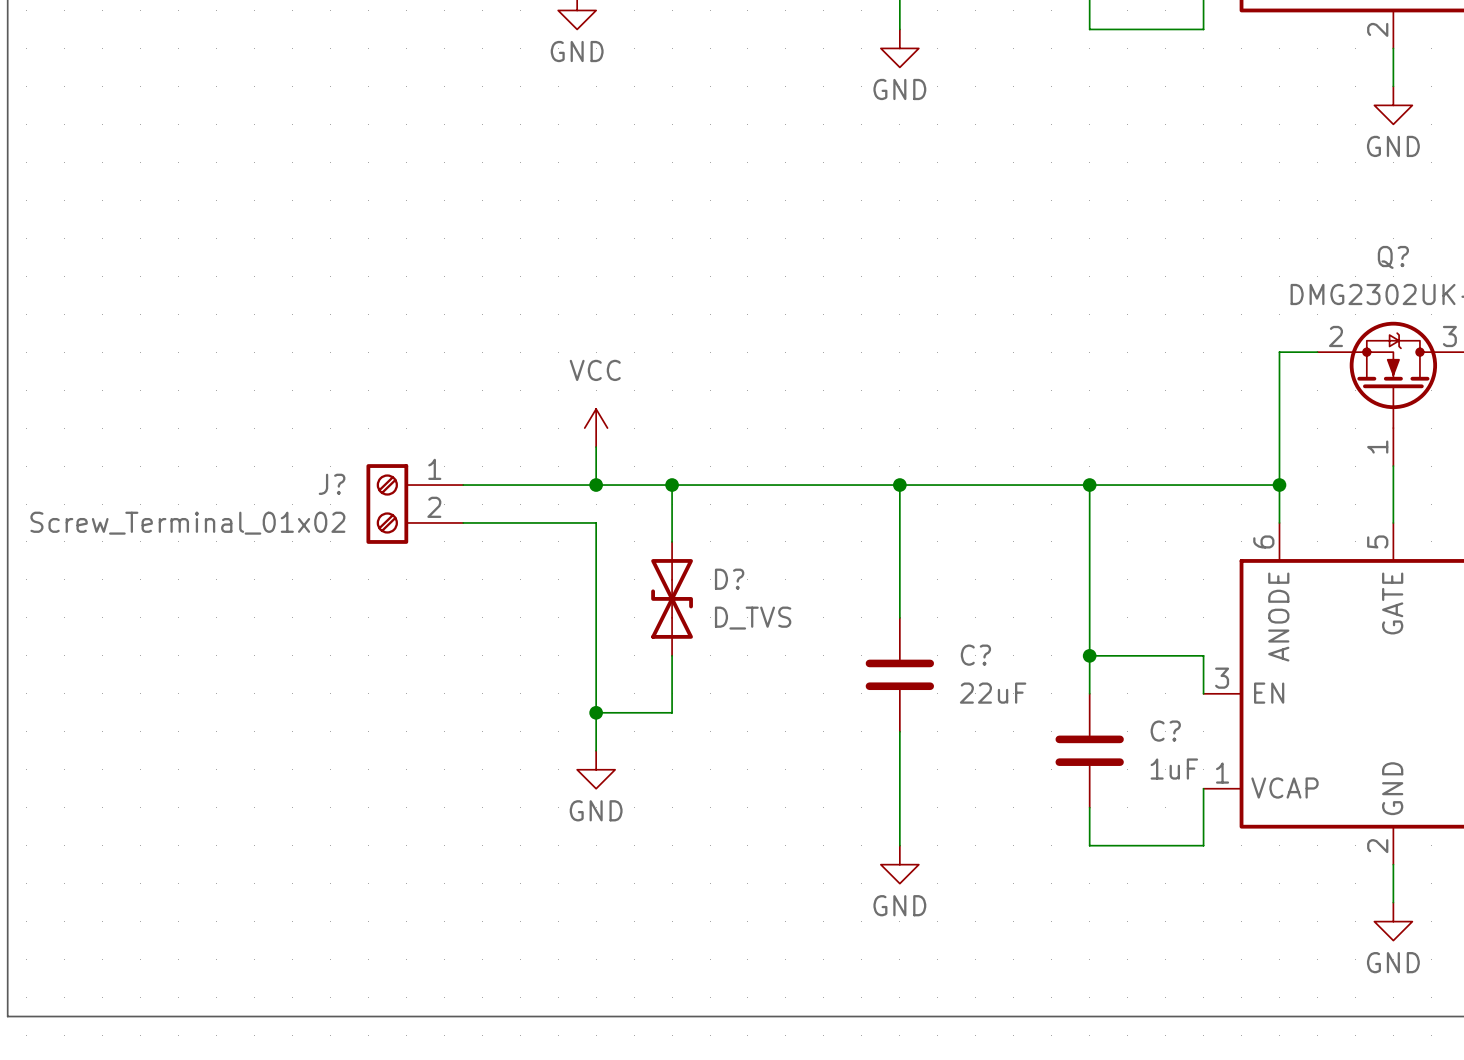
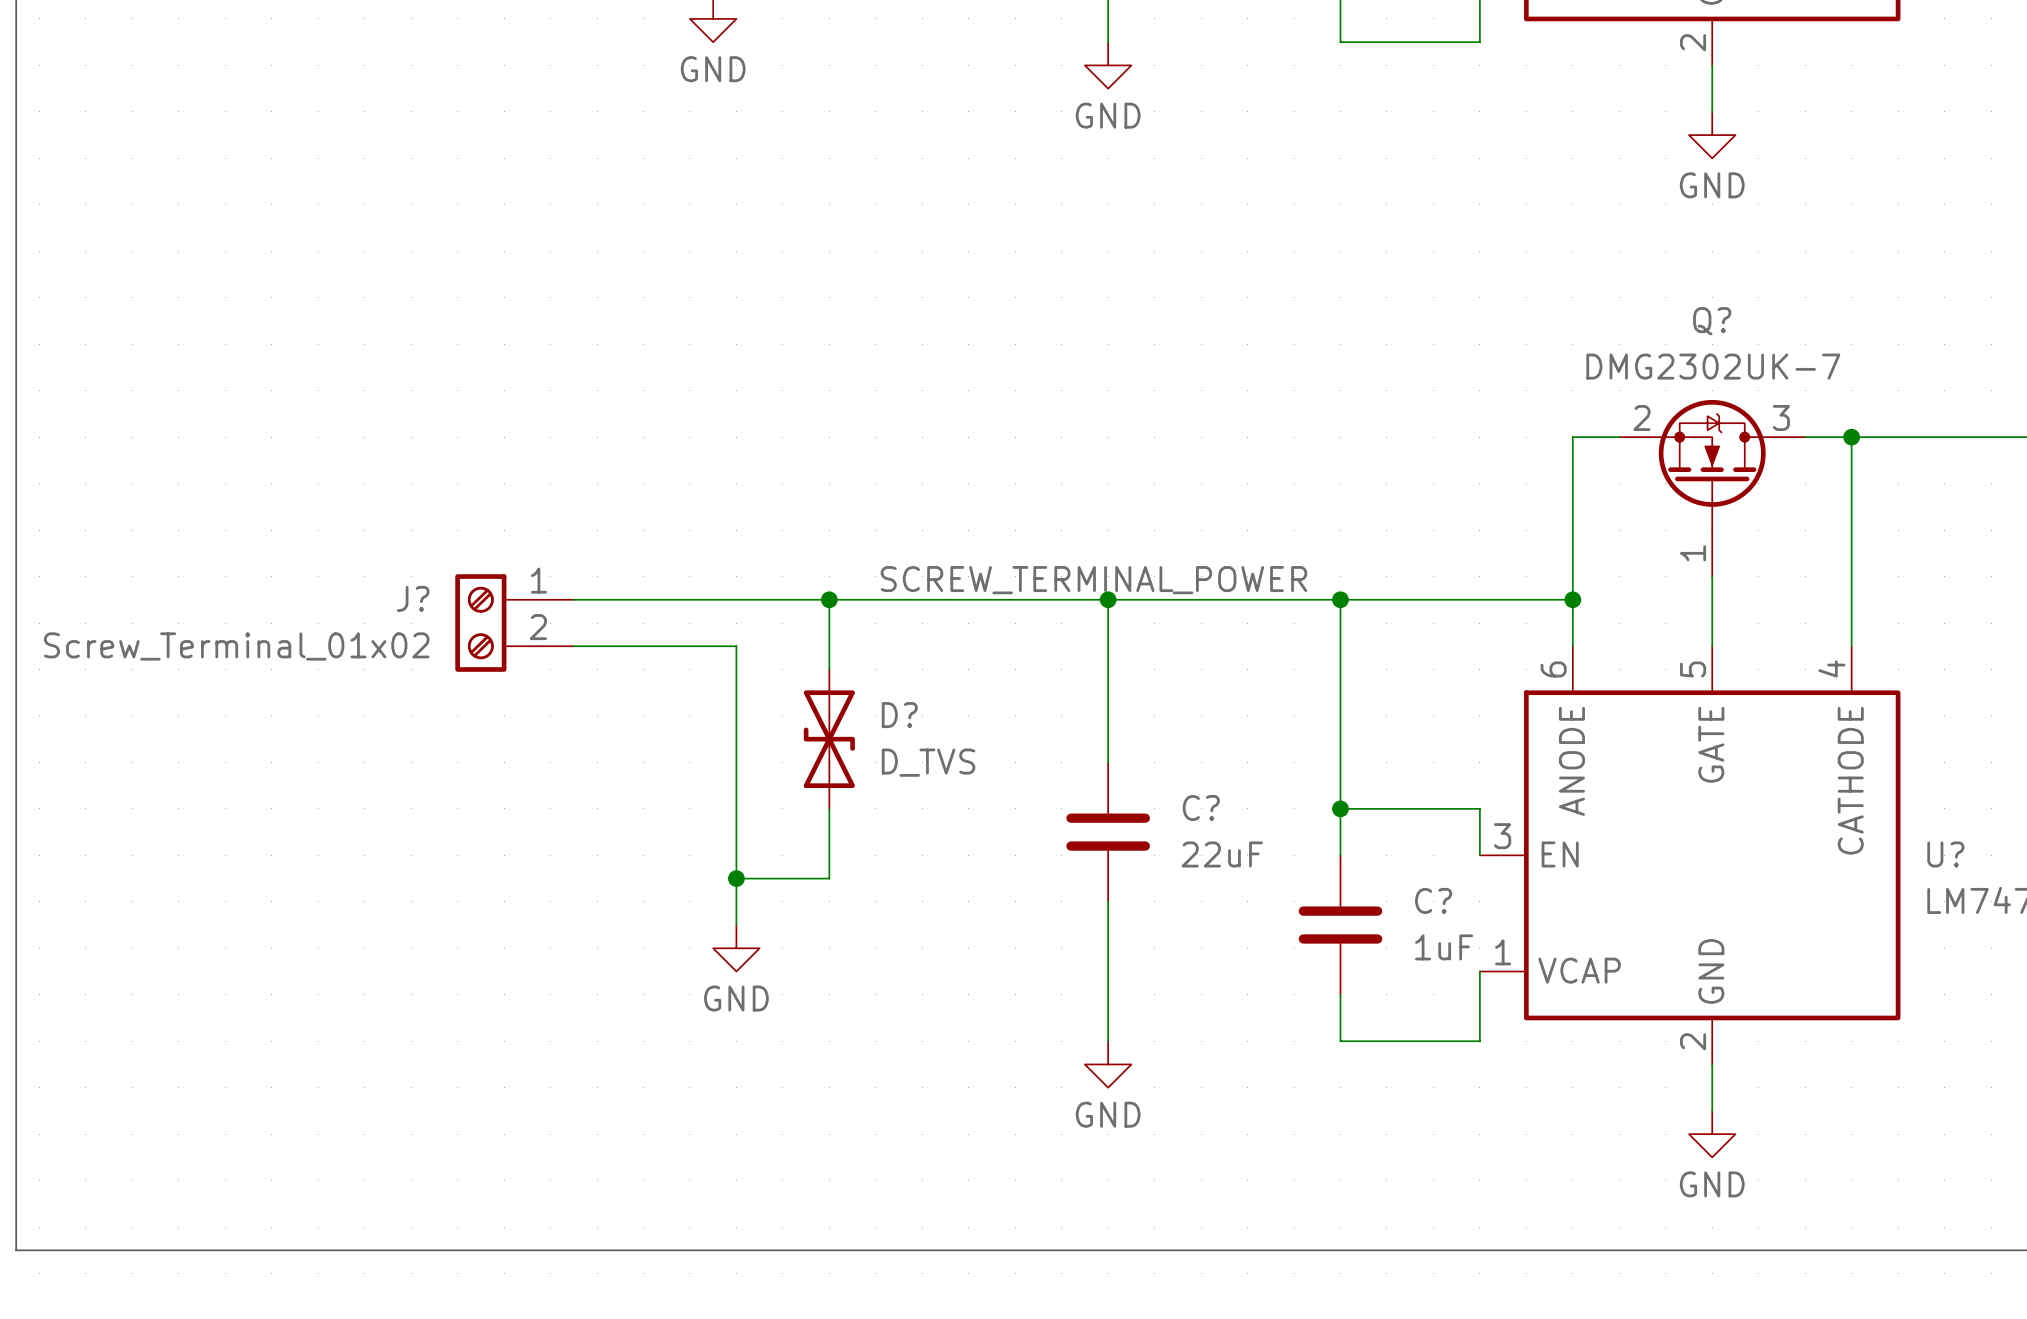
power symbol: VCC (596, 428) -> none
wire: (596, 447) (596, 485) -> none
label: none -> SCREW_TERMINAL_POWER (1093, 580)
junction: (596, 485) -> none

